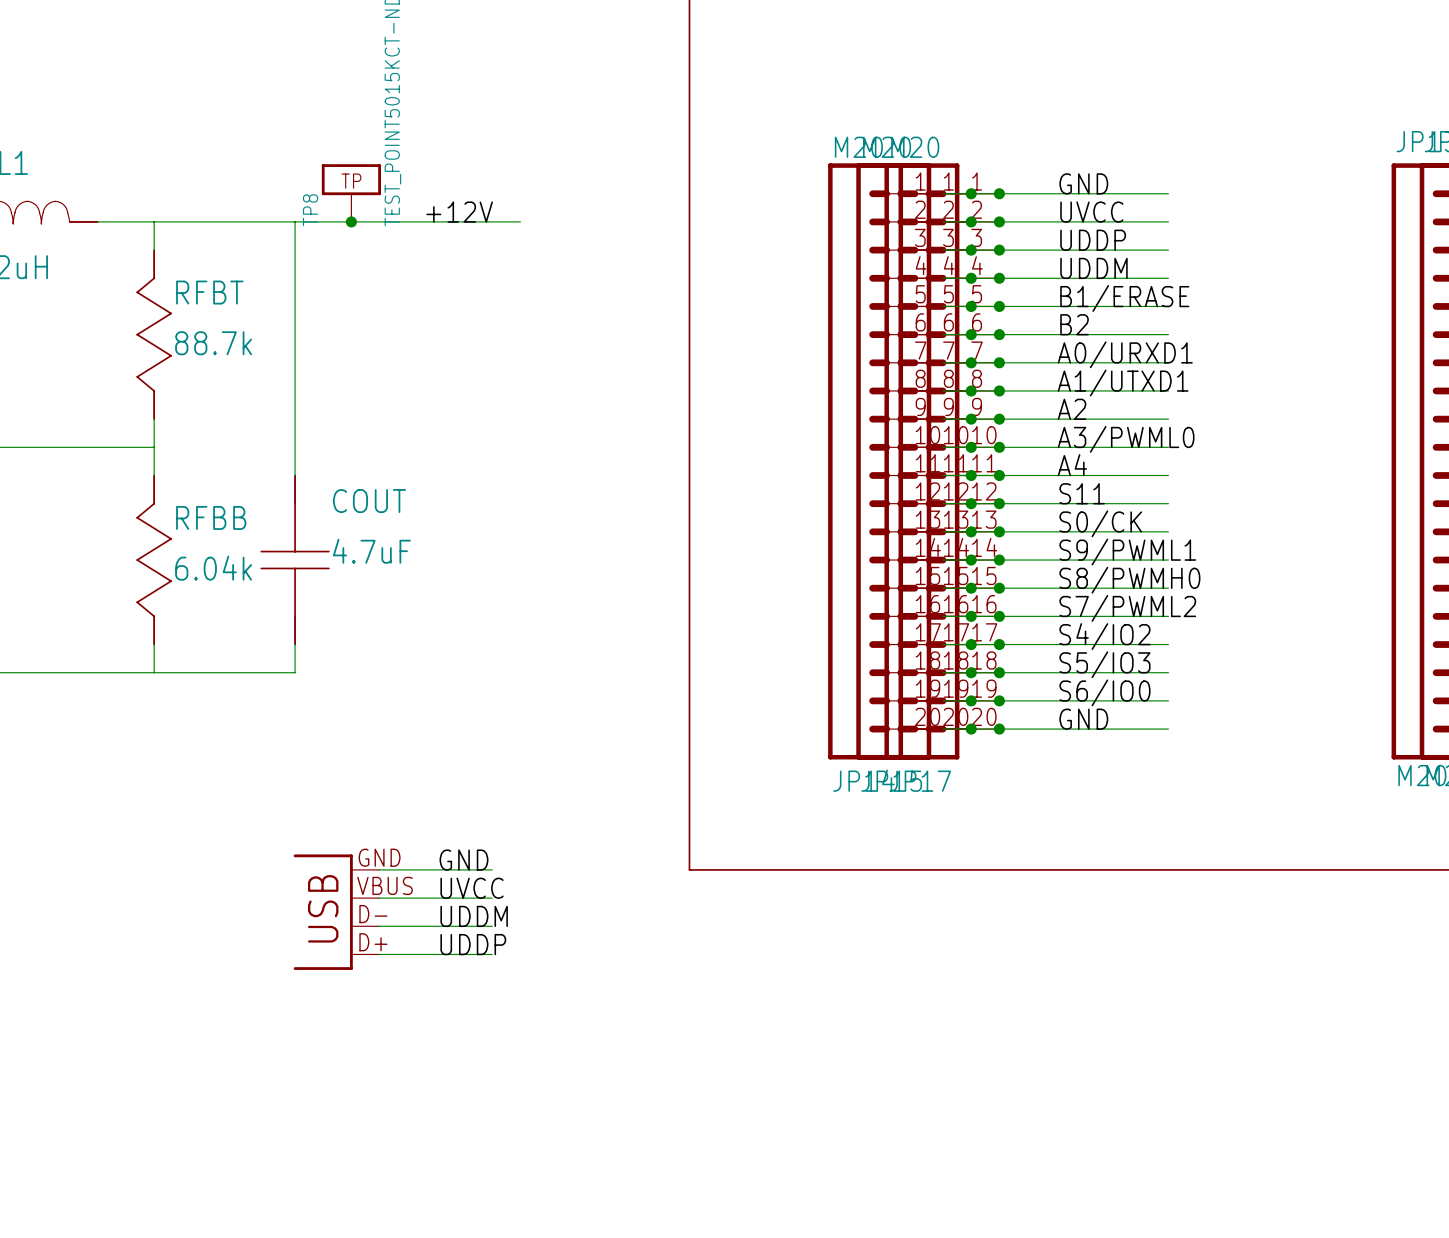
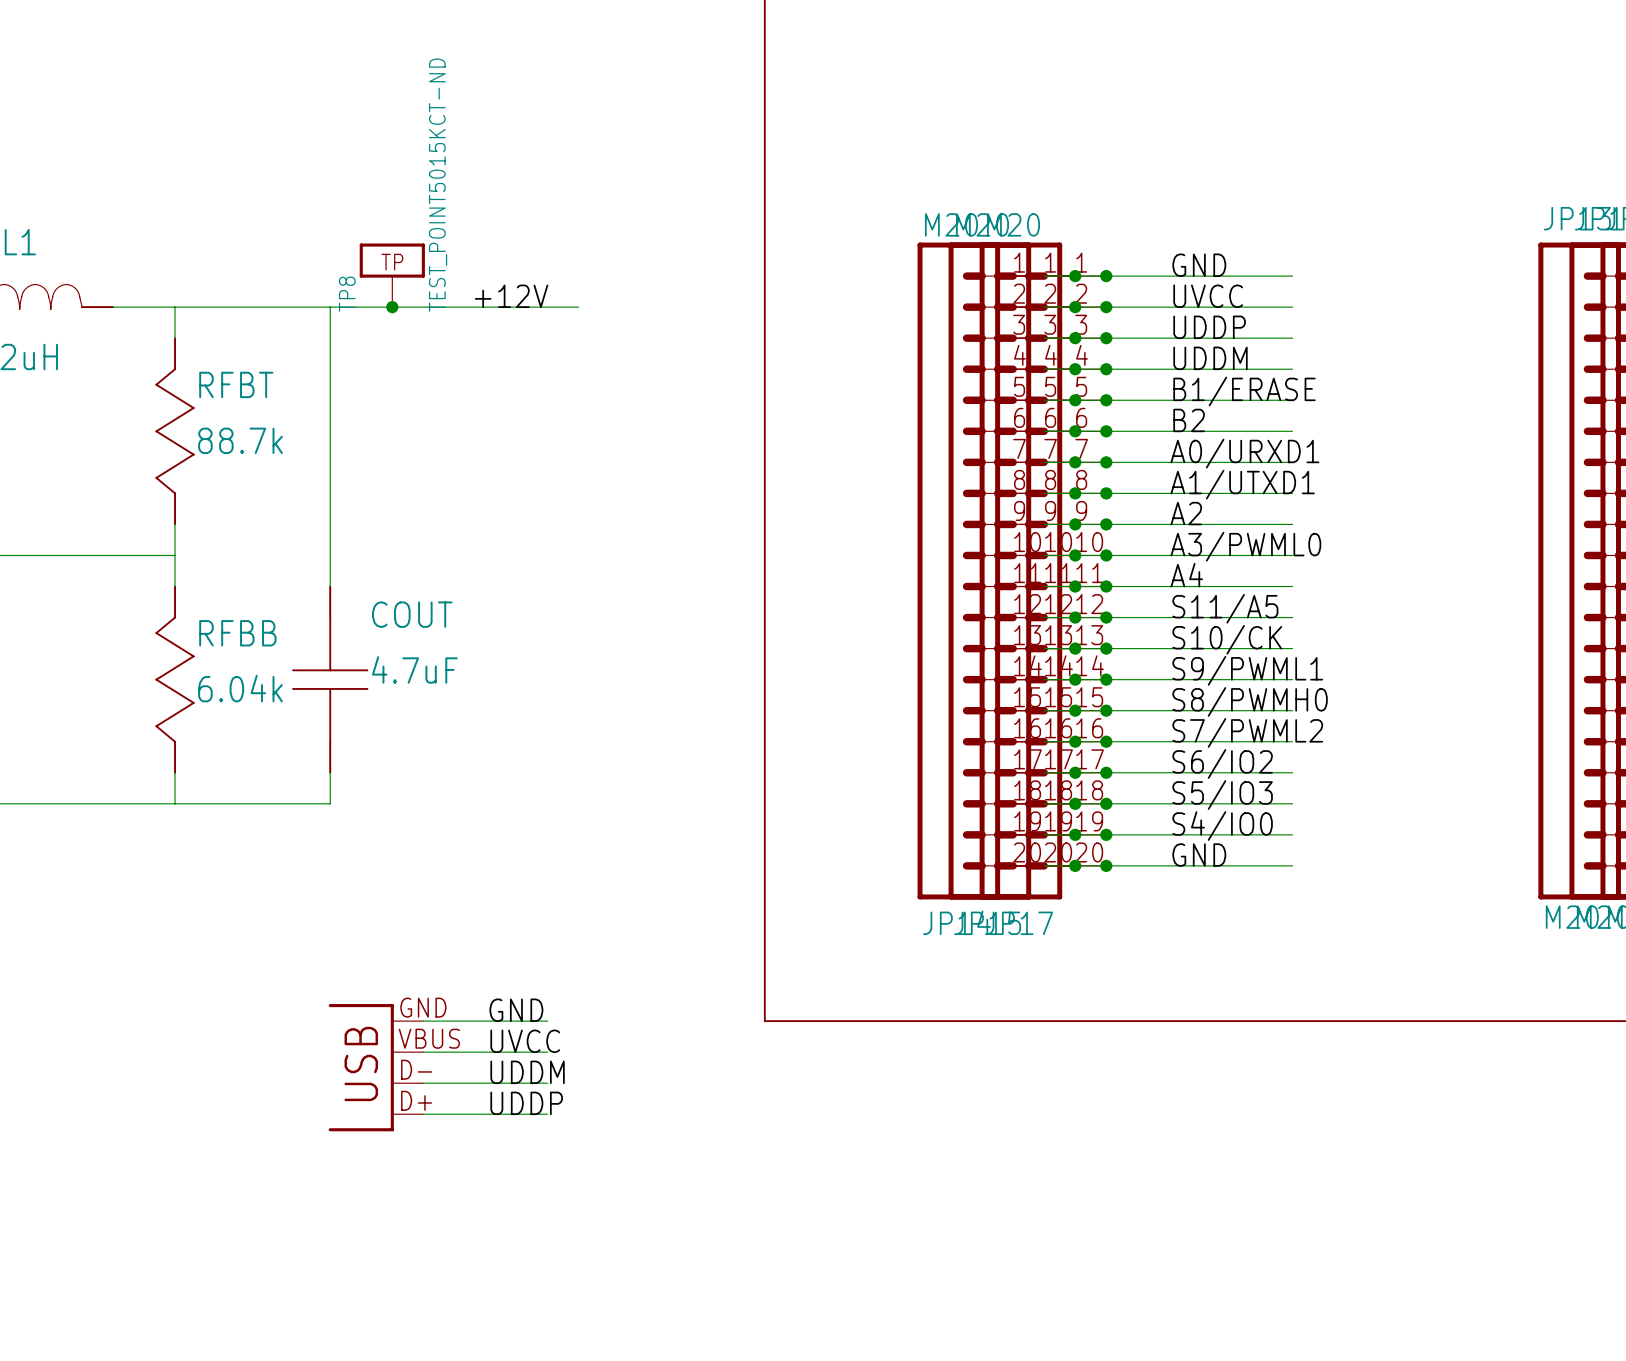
label: S11 (1082, 493) -> S11/A5 (1225, 608)
label: S0/CK (1100, 523) -> S10/CK (1227, 639)
label: S4/IO2 (1104, 636) -> S6/IO2 (1222, 763)
label: S6/IO0 (1104, 692) -> S4/IO0 (1222, 826)

